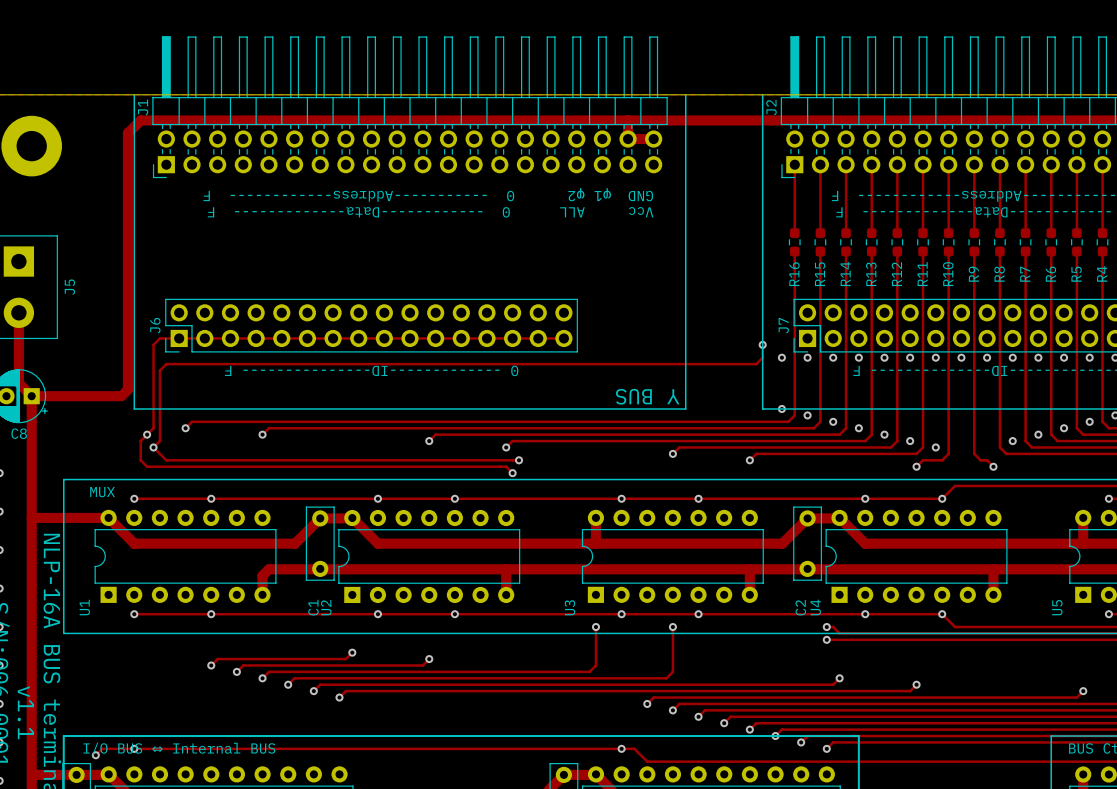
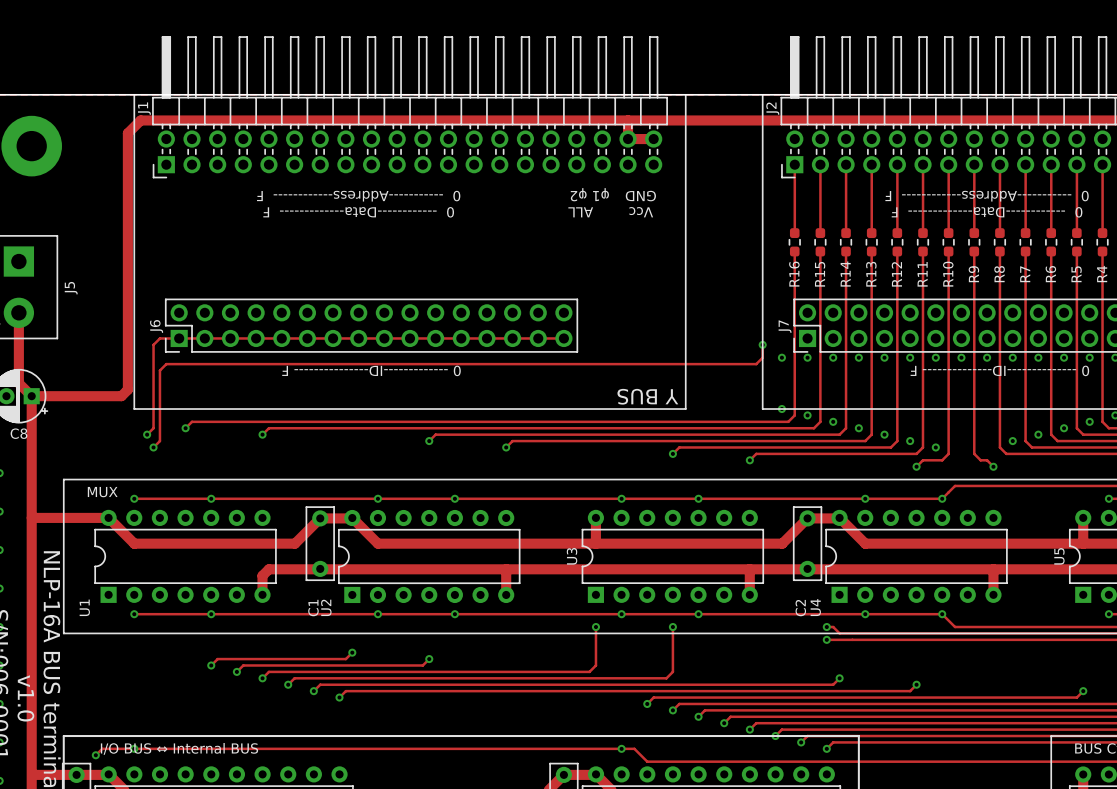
track: (147, 434) (140, 441) (140, 460) (147, 466) (506, 466) (512, 473) -> none
track: (153, 447) (166, 460) (519, 460) -> none
via: (519, 460) -> none
via: (512, 473) -> none
U3 name position: U3 (569, 607) -> U3 (572, 556)
U5 name position: U5 (1057, 607) -> U5 (1059, 556)
text: v1.1 (25, 712) -> v1.0 (25, 698)

